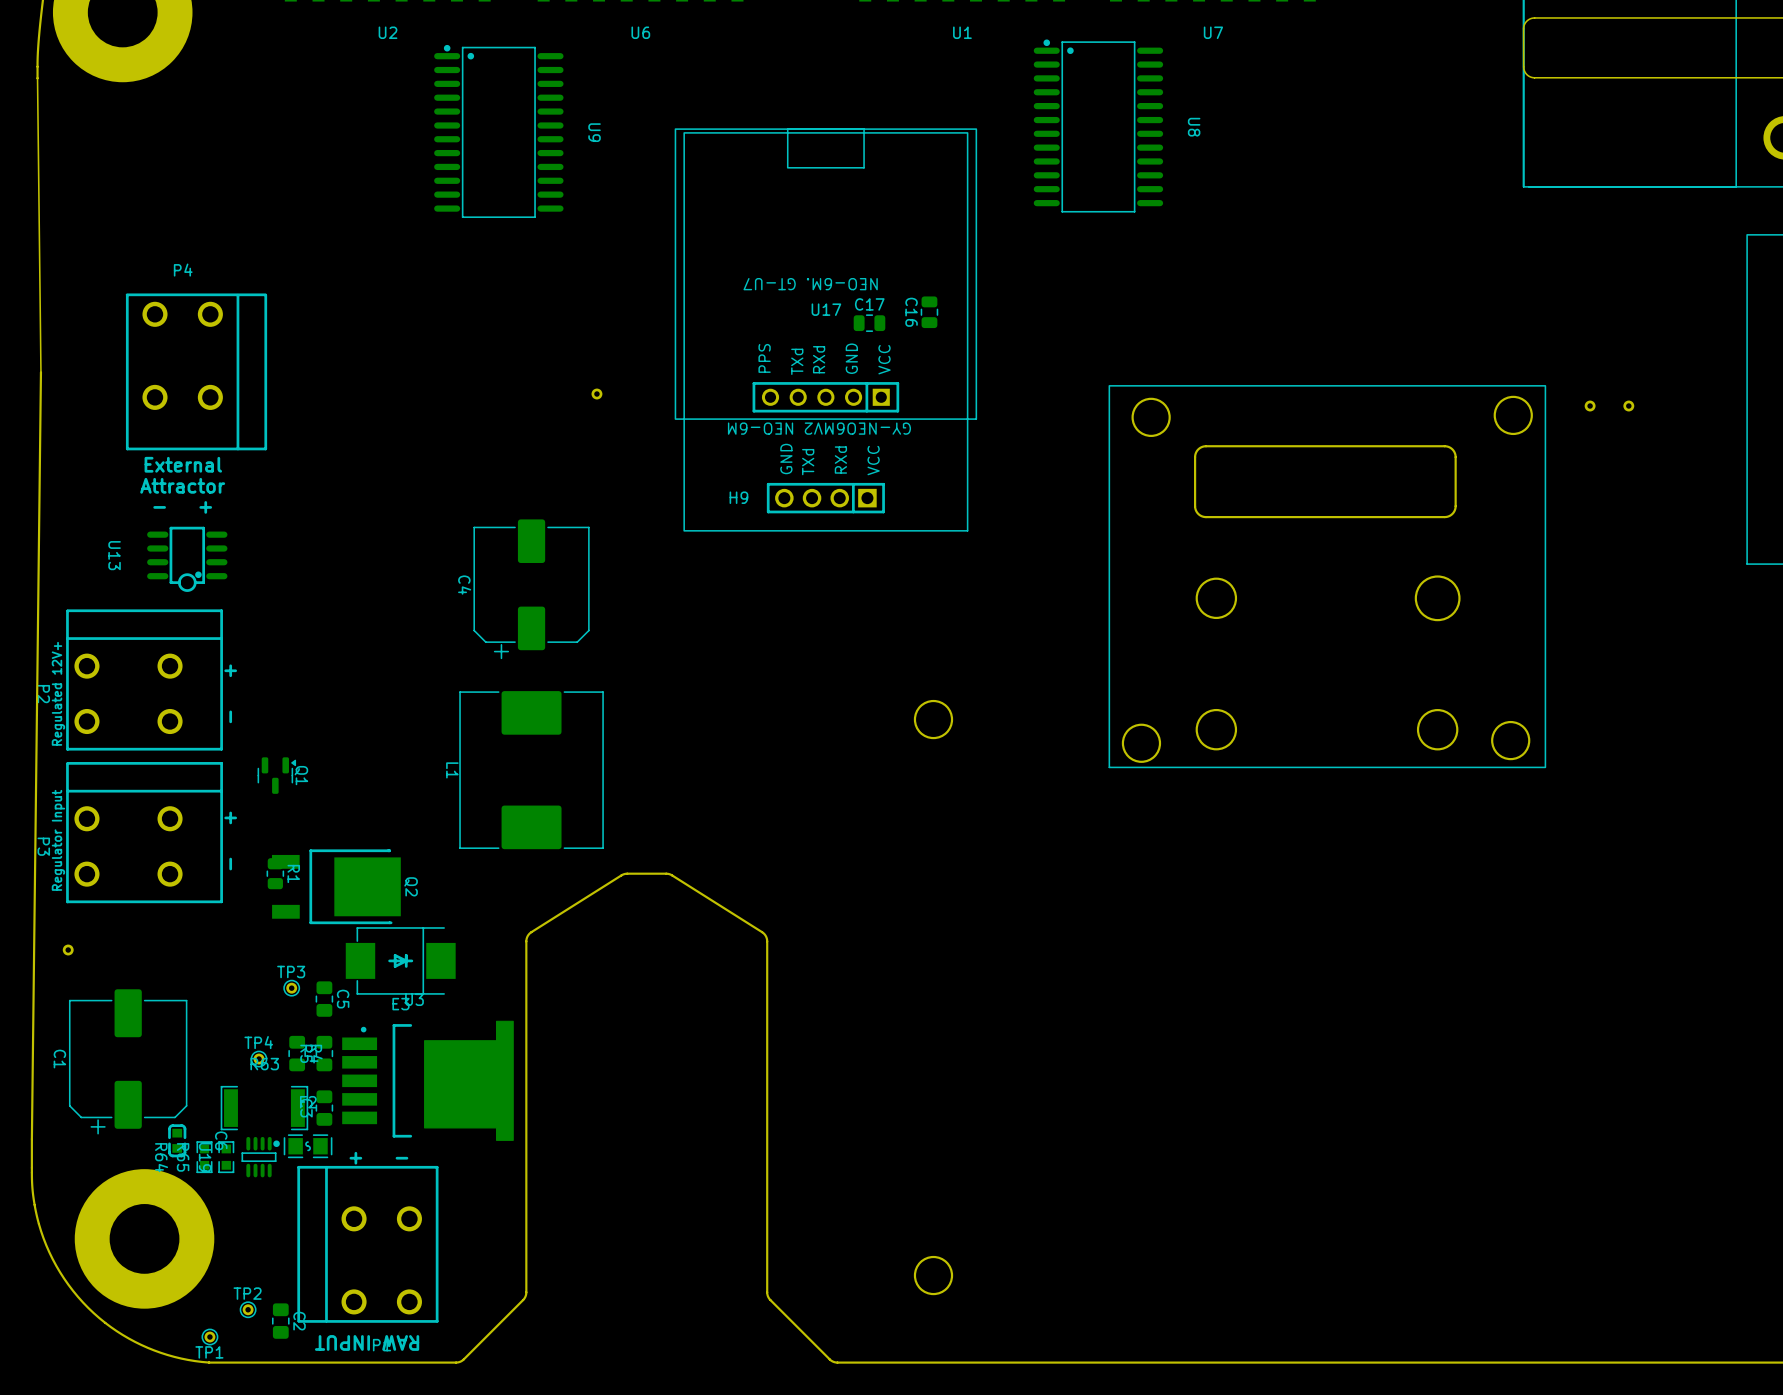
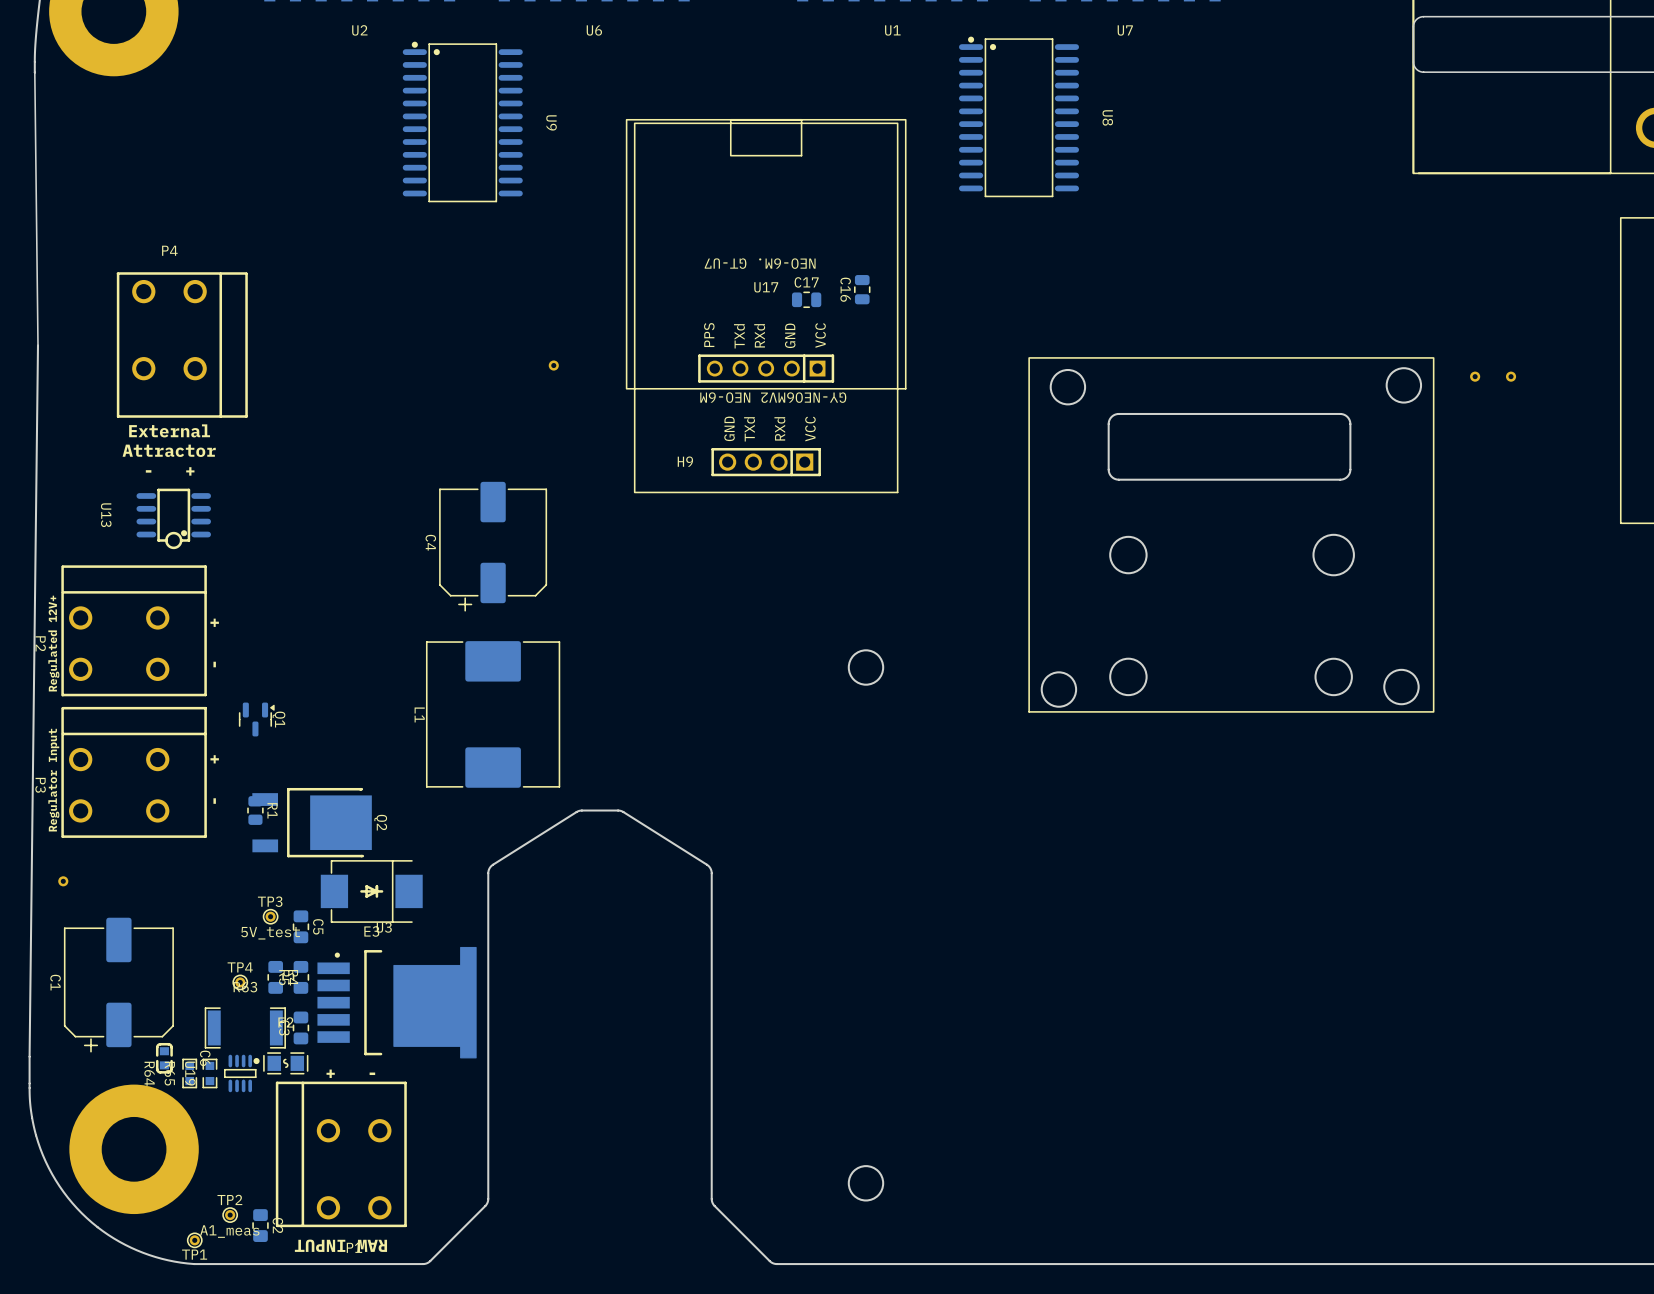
TP3 value: none -> 5V_test (270, 933)
TP2 value: none -> A1_meas (229, 1231)

